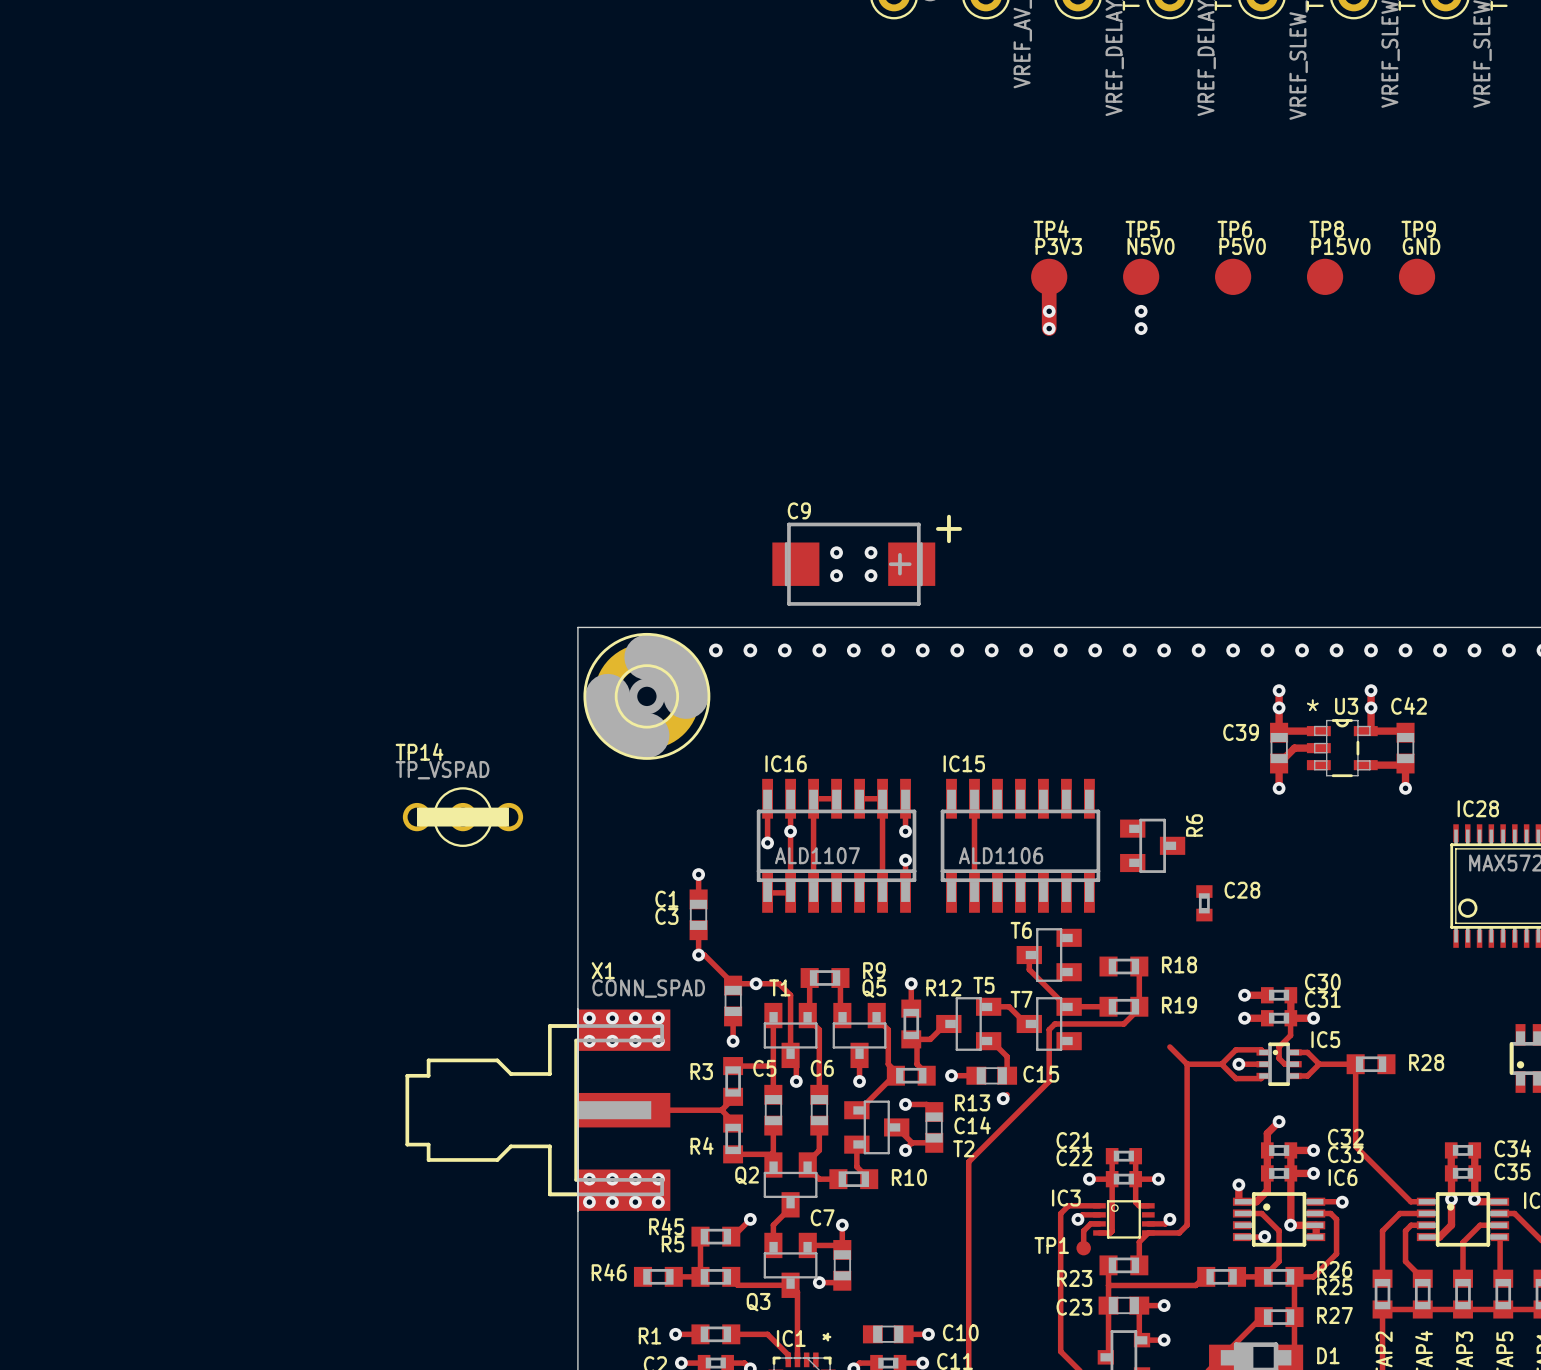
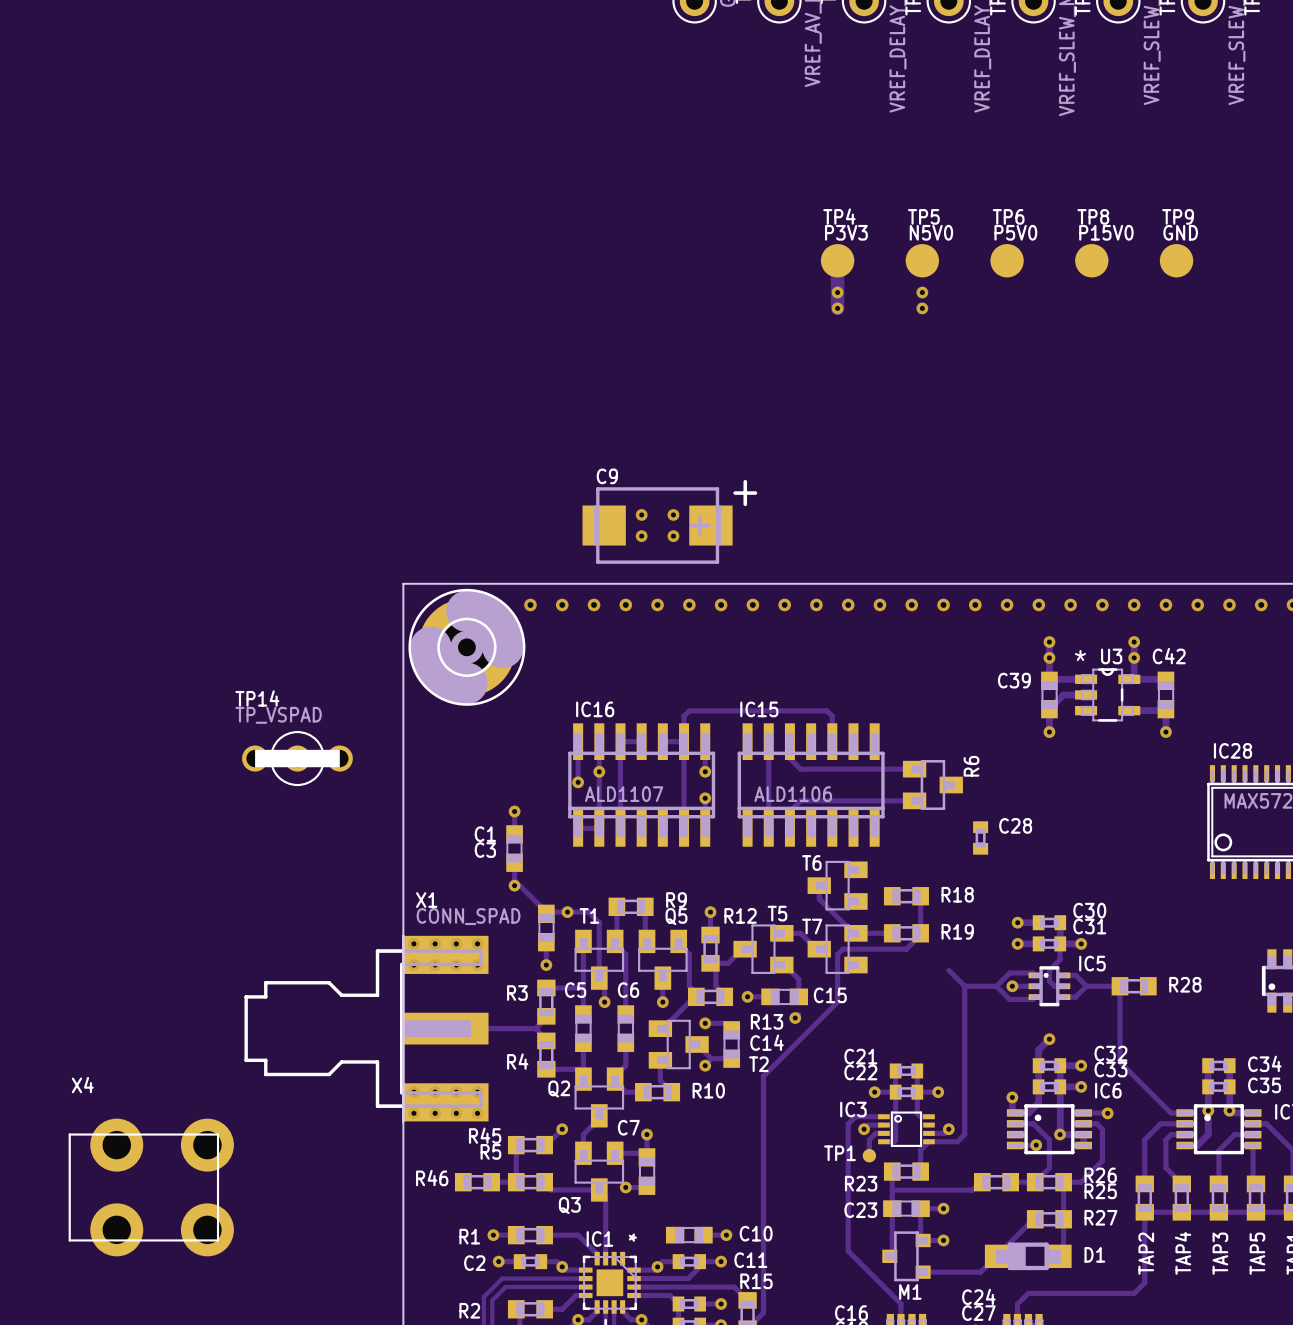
track: none -> (684, 741) (684, 716) (689, 710) (827, 710) (832, 716) (832, 741)
track: none -> (789, 741) (789, 758) (800, 769) (914, 769)
track: none -> (914, 800) (800, 800) (789, 811) (789, 828)
X4: none -> (151, 1187)

